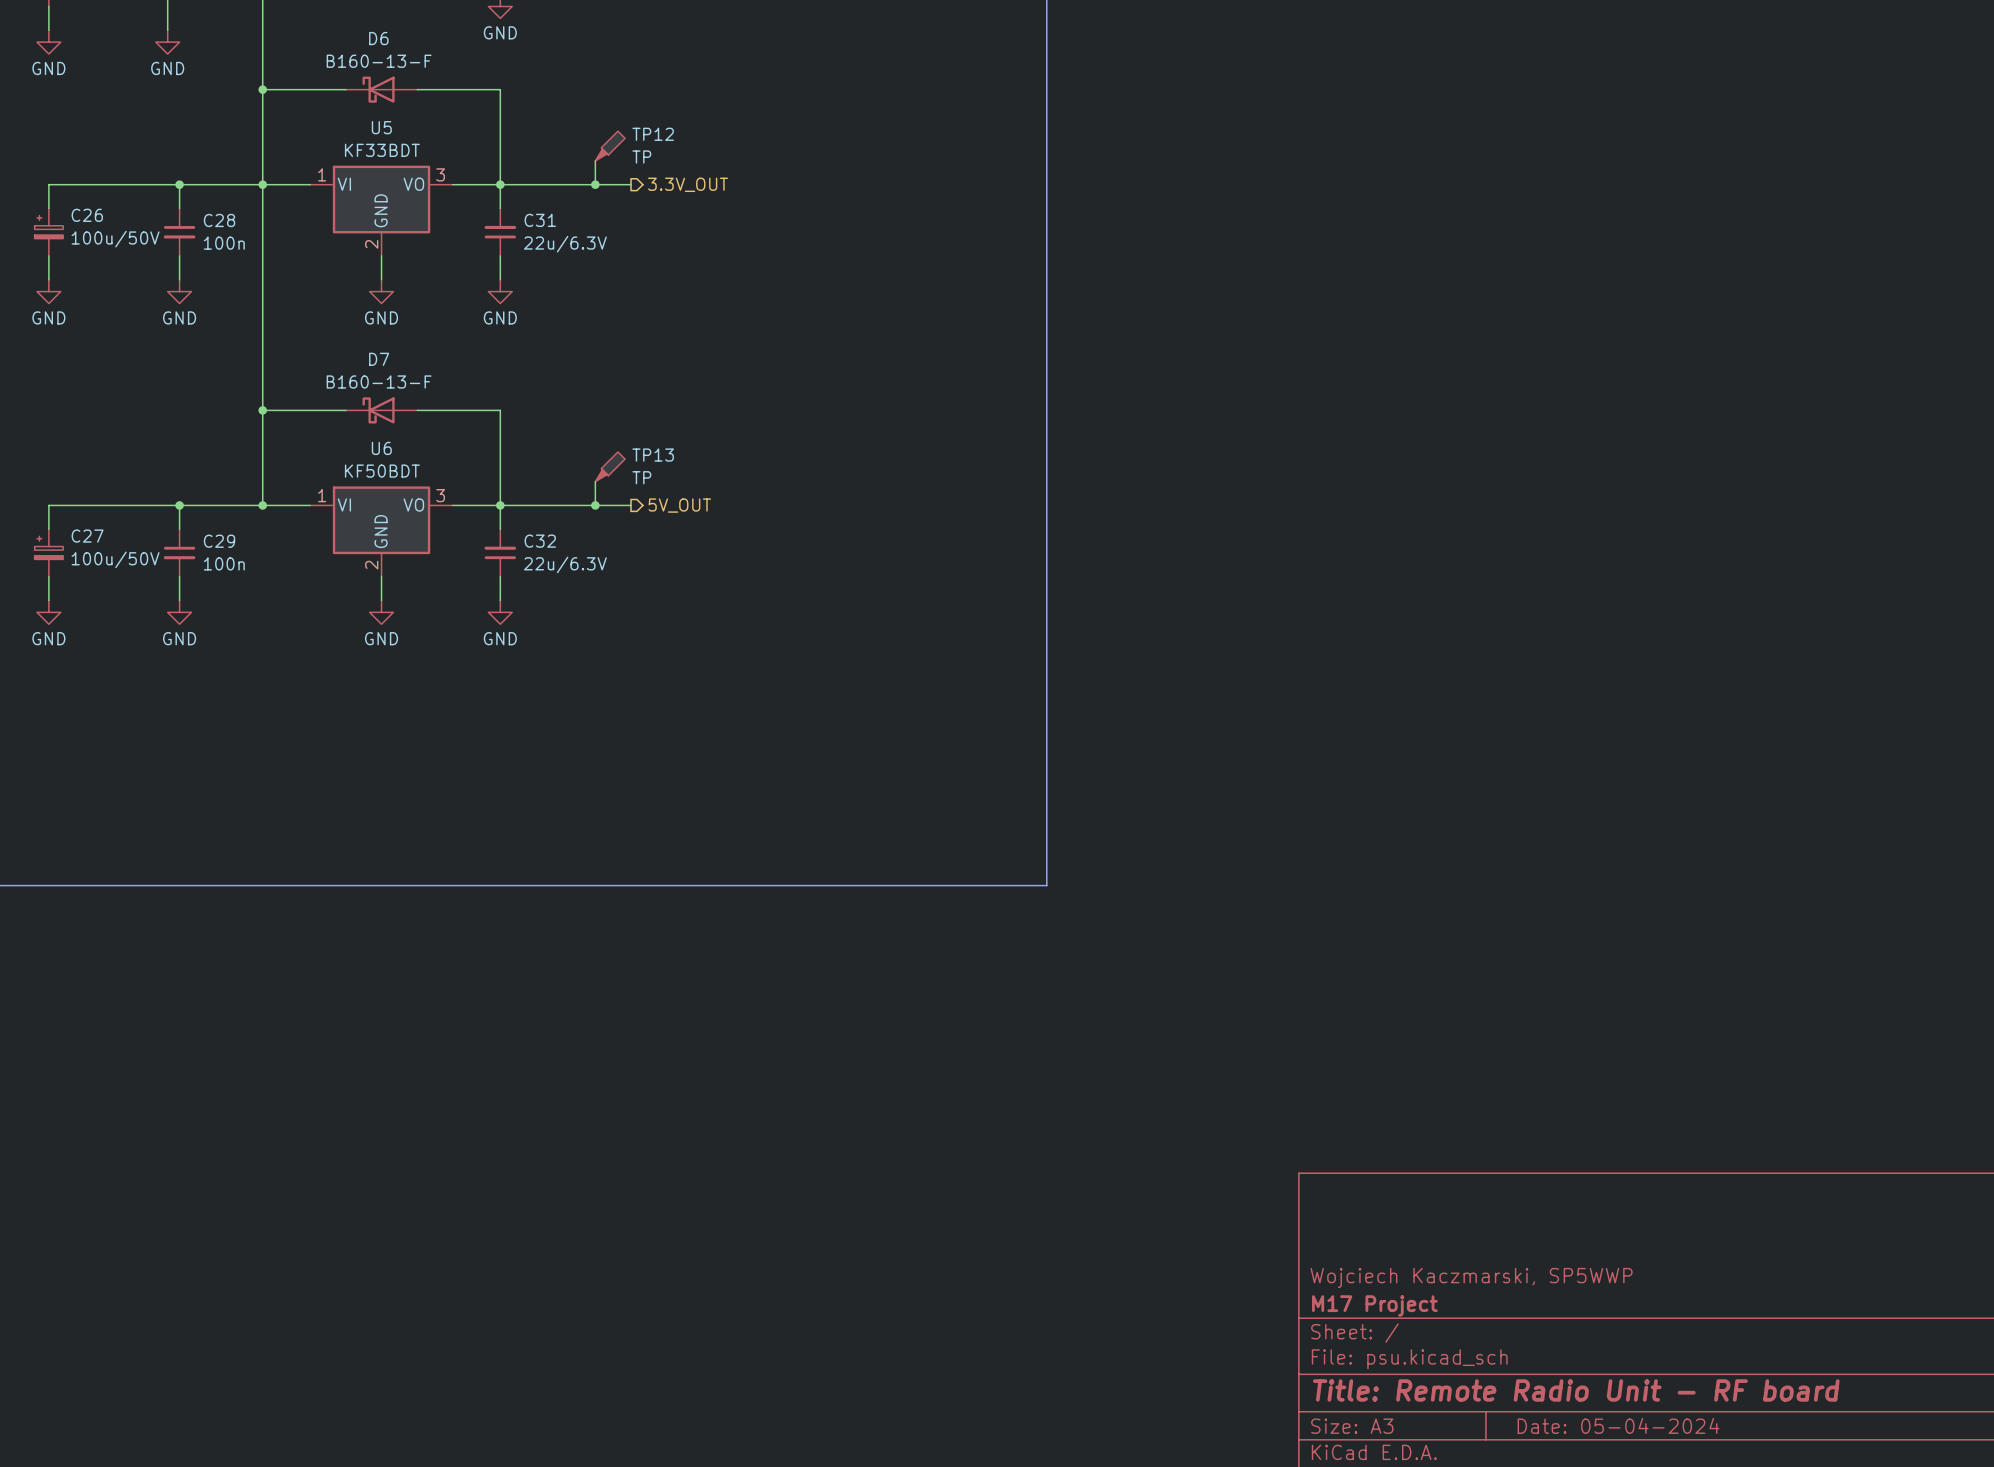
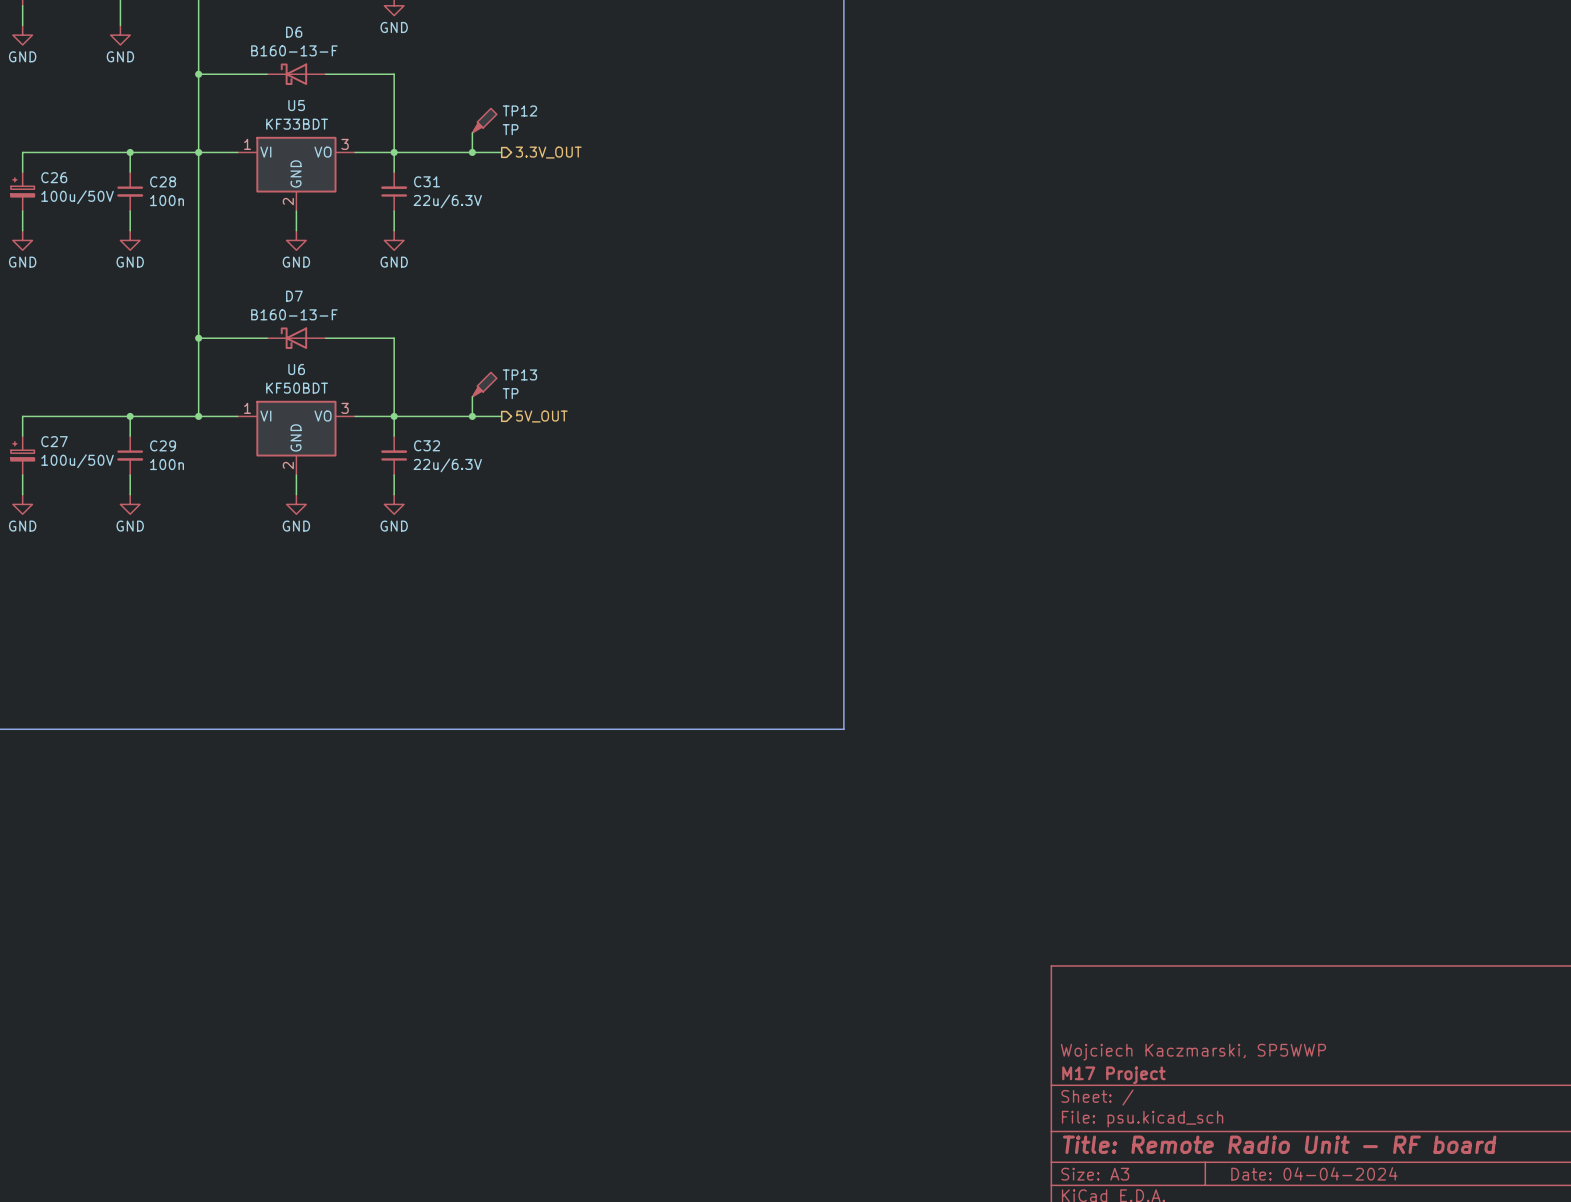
title block: Date: 05-04-2024 (1618, 1425) -> Date: 04-04-2024 (1314, 1173)

